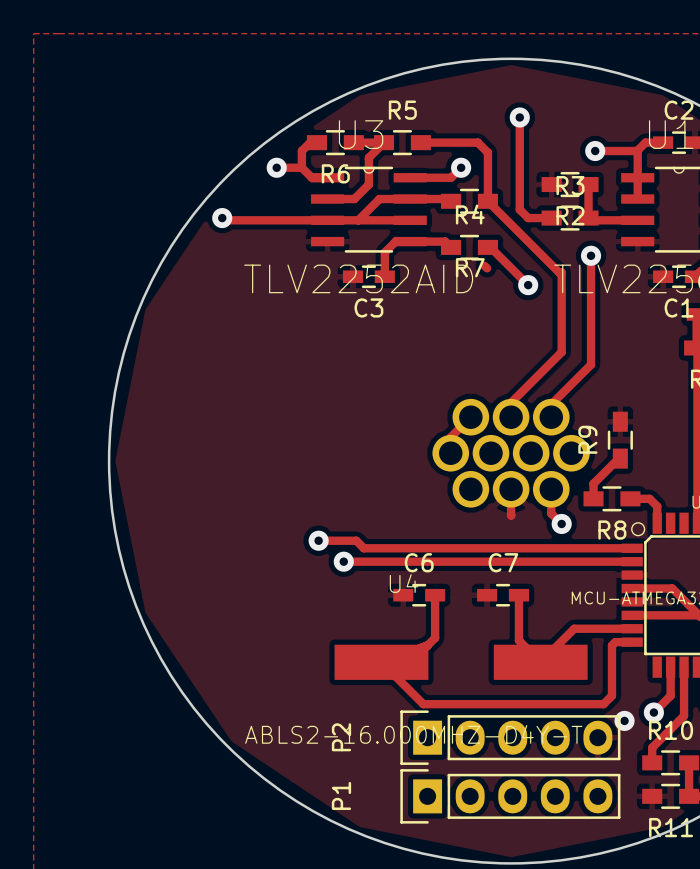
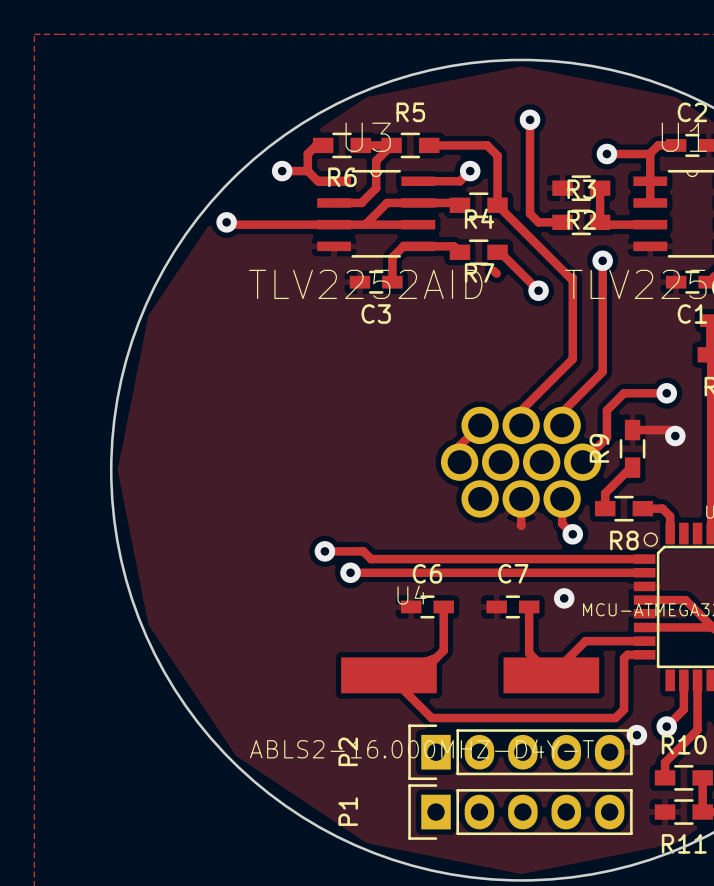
track: none -> (666, 393) (624, 393) (606, 410) (606, 437) (582, 462)
via: none -> (666, 393)
track: none -> (632, 430) (669, 430) (675, 436)
via: none -> (675, 436)
via: none -> (564, 598)

